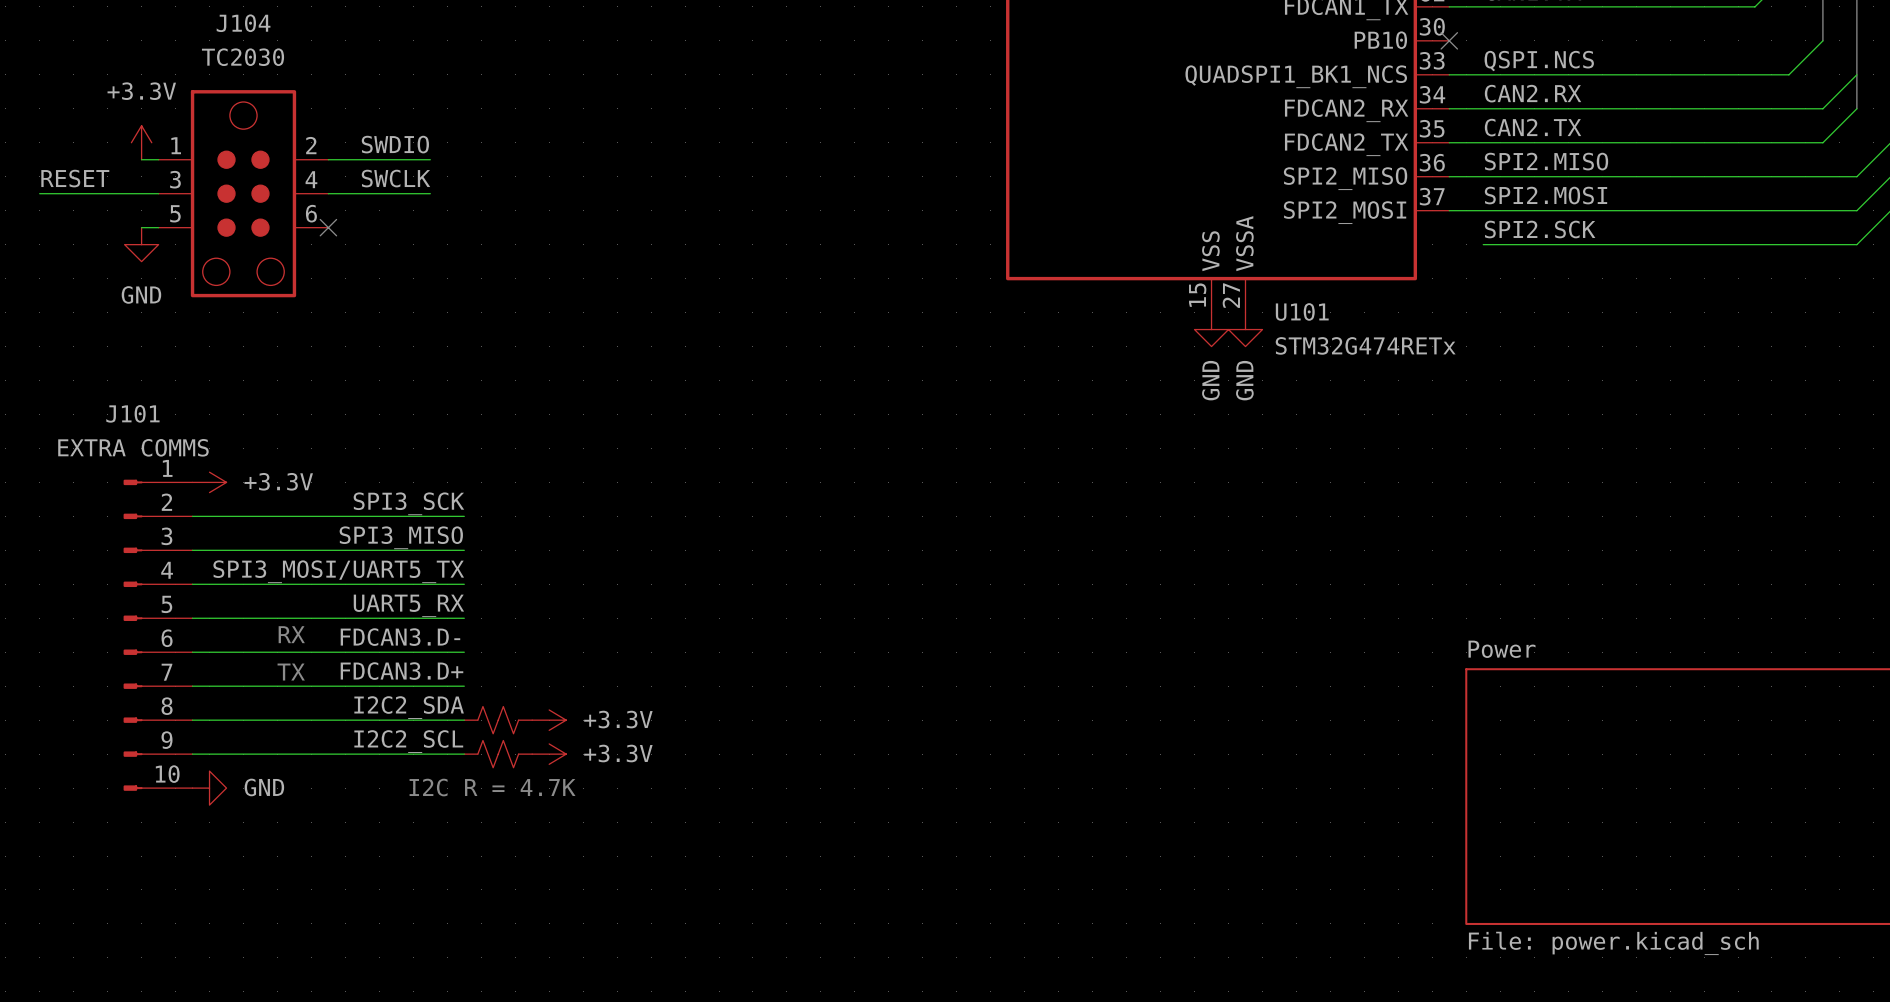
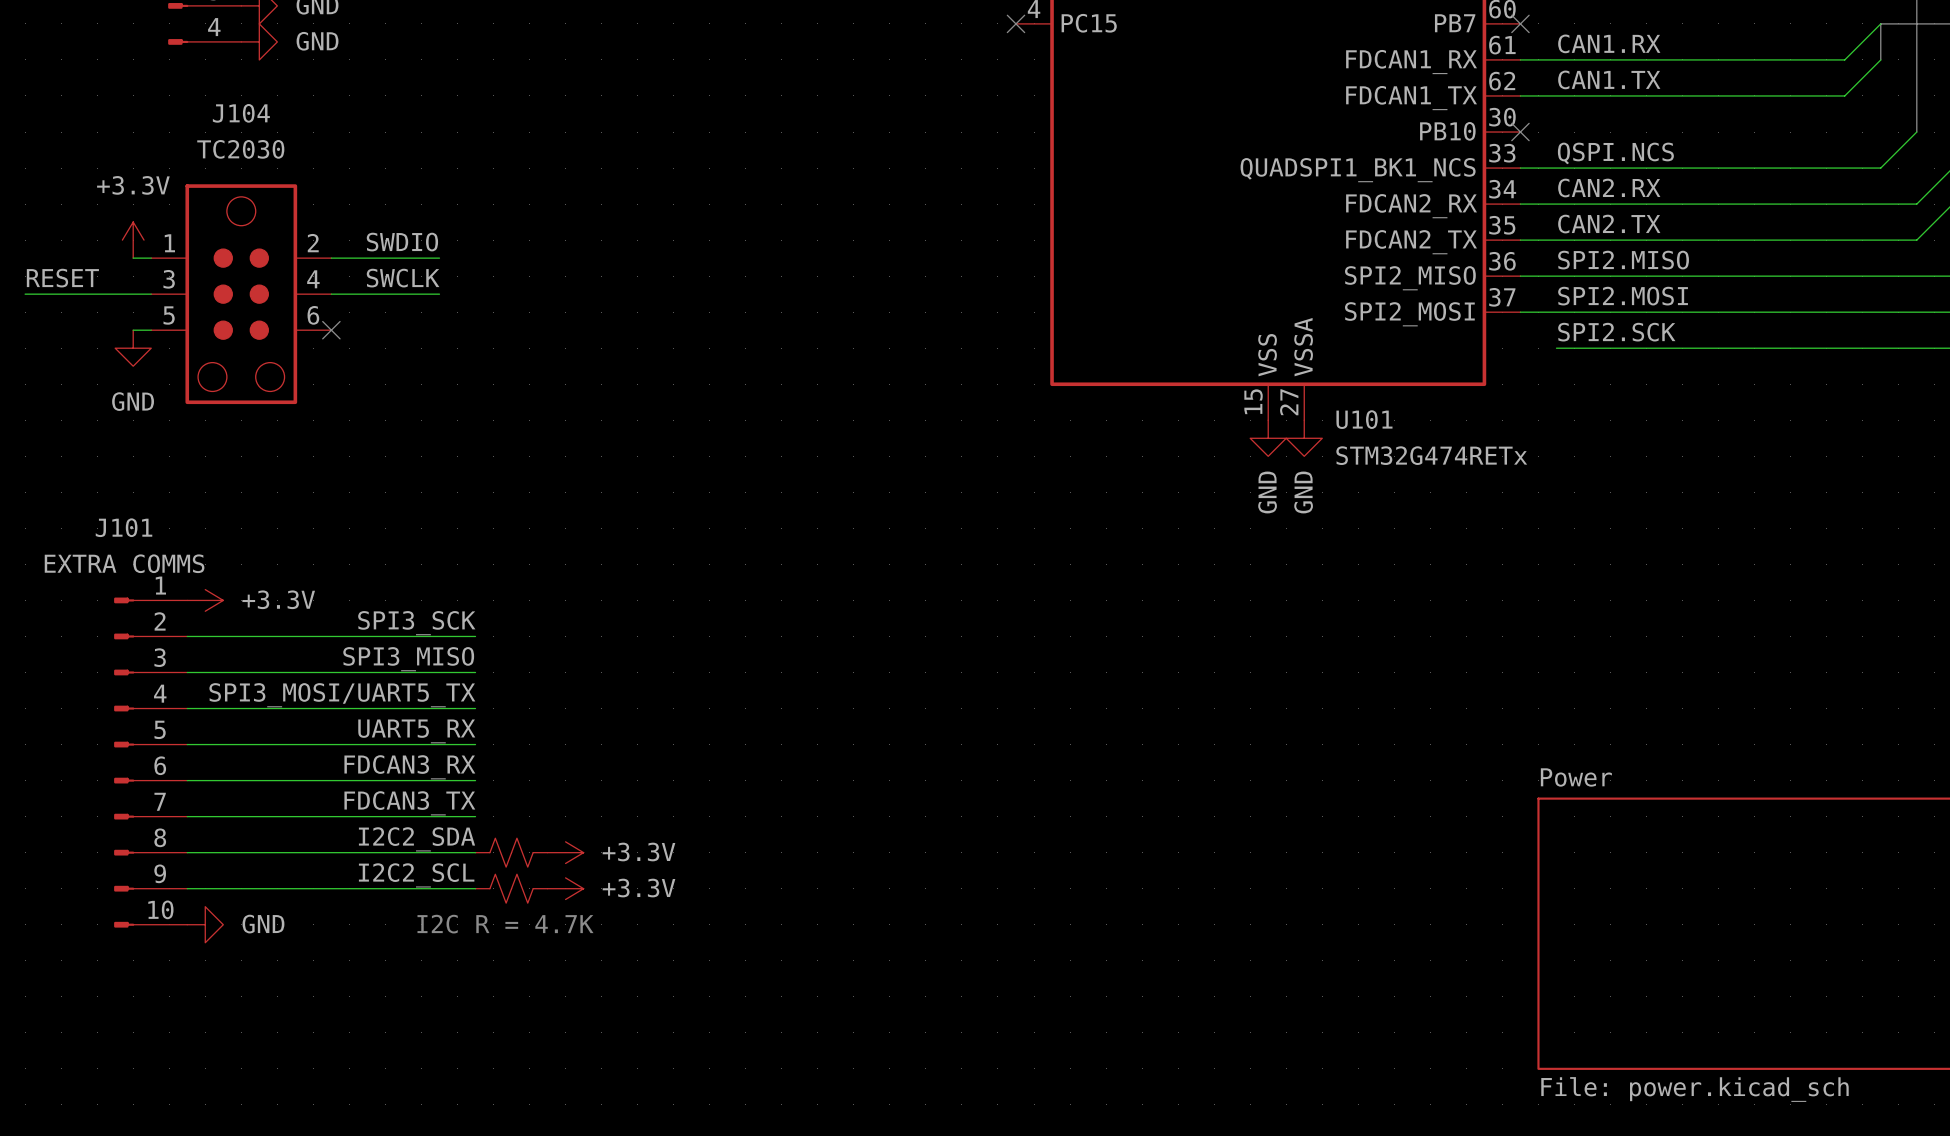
text: RX (291, 634) -> none
label: FDCAN3.D- (400, 637) -> FDCAN3_RX (409, 767)
label: FDCAN3.D+ (401, 671) -> FDCAN3_TX (409, 803)
text: TX (291, 672) -> none

